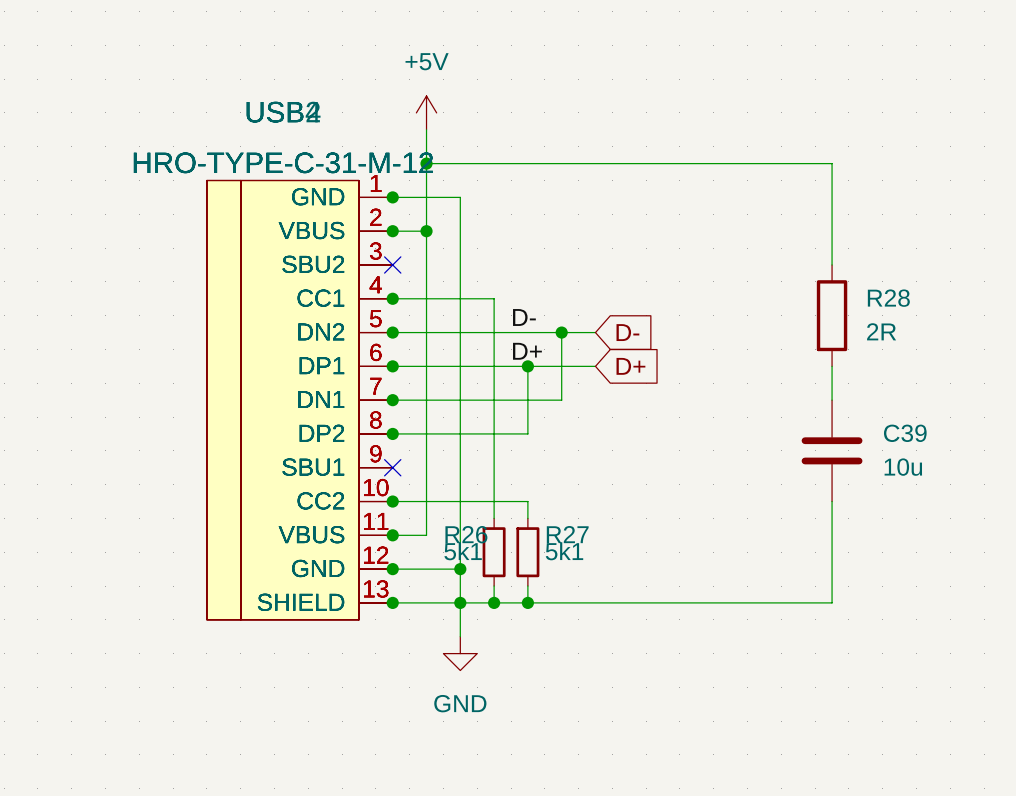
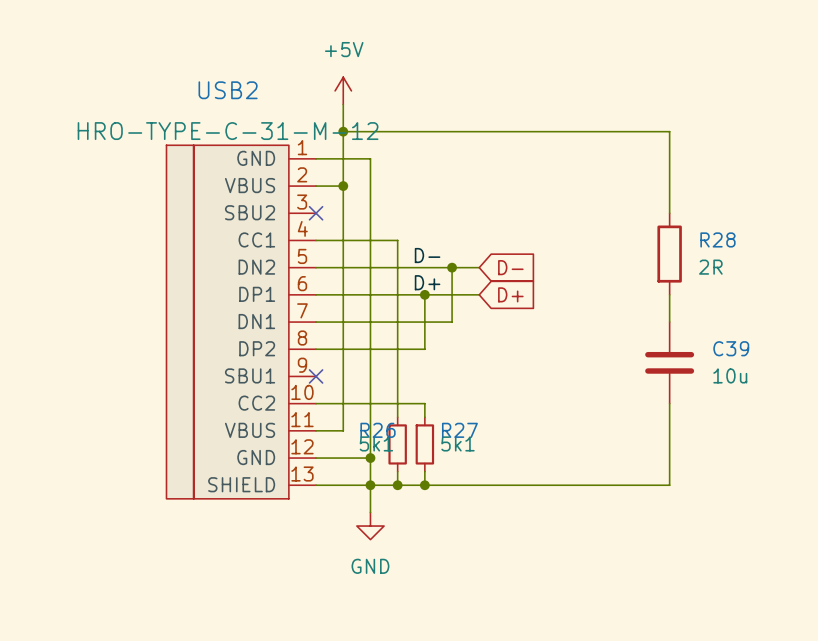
junction: (392, 197) -> none
junction: (392, 231) -> none
junction: (392, 298) -> none
junction: (392, 332) -> none
junction: (392, 366) -> none
part: HRO-TYPE-C-31-M-12 (299, 400) -> none
junction: (392, 400) -> none
junction: (392, 433) -> none
junction: (392, 501) -> none
junction: (392, 535) -> none
junction: (392, 569) -> none
junction: (392, 602) -> none

